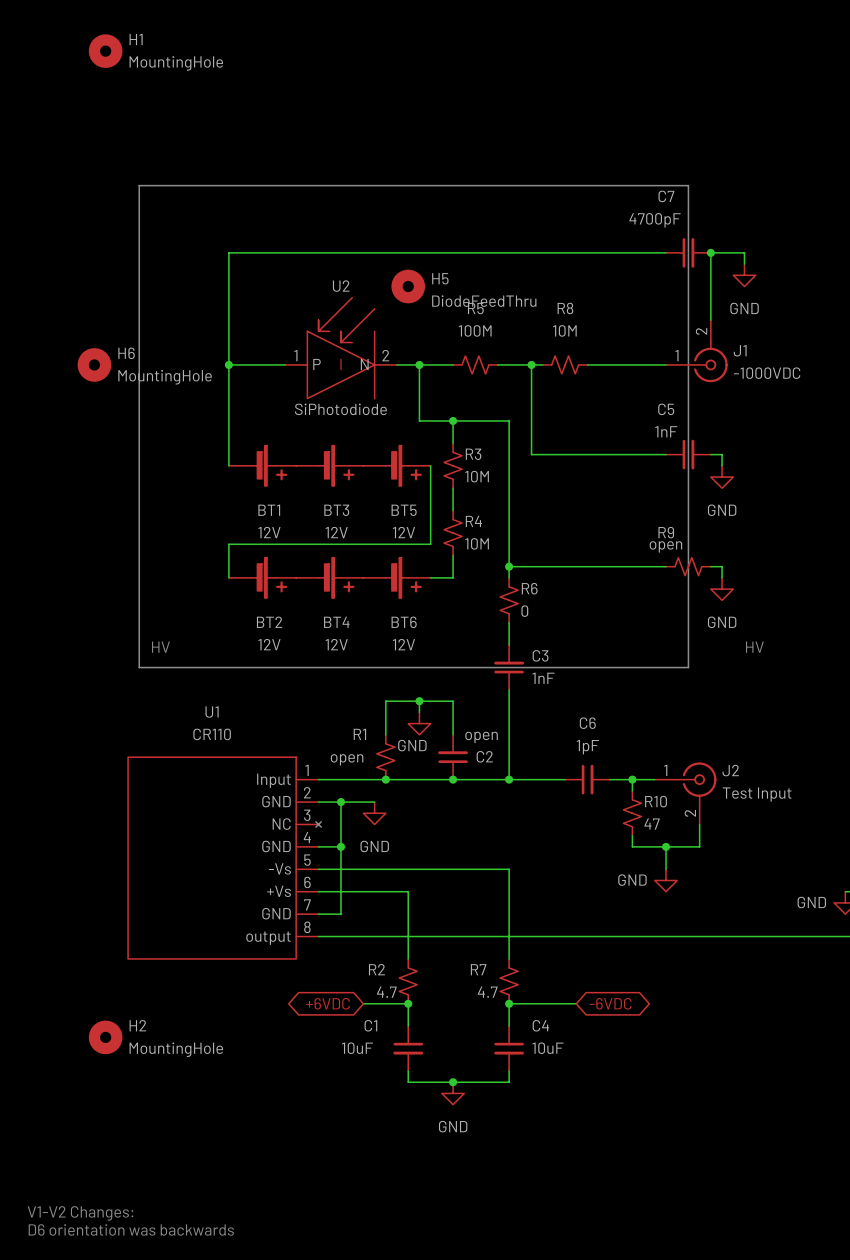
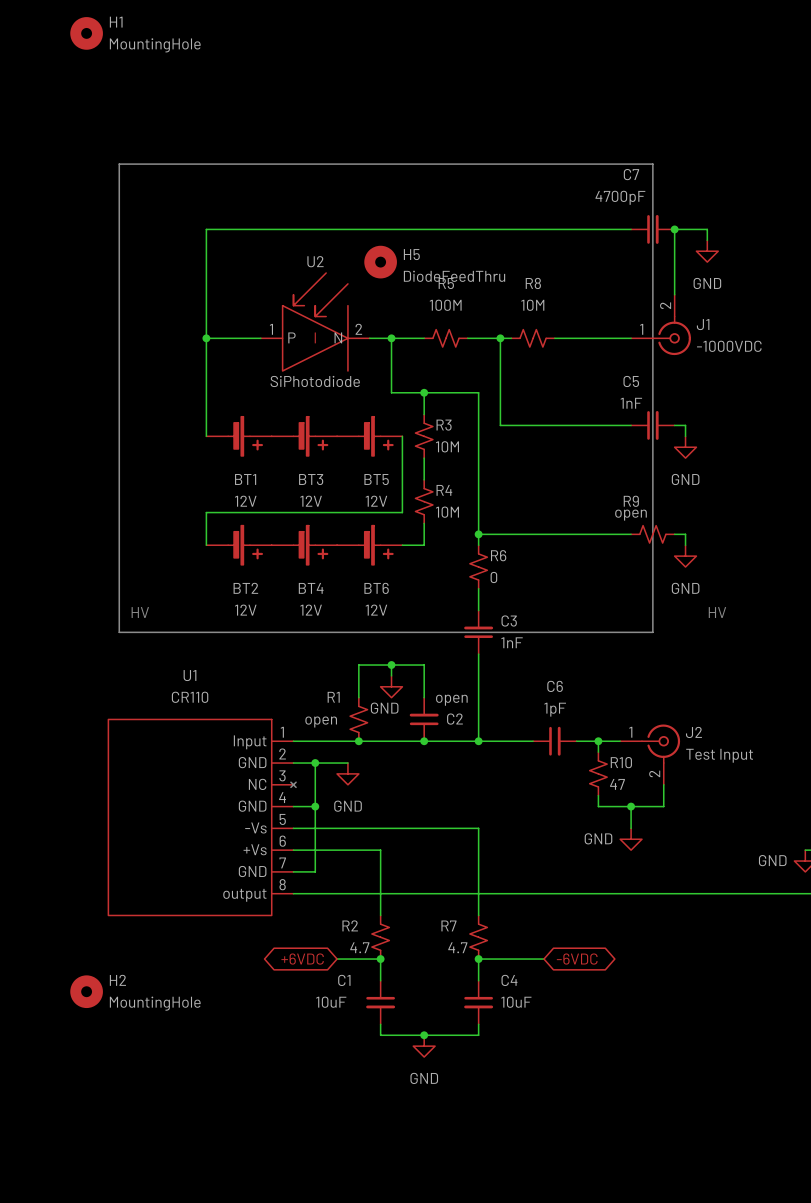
H6: MountingHole (94, 364) -> none
text: V1-V2 Changes: (80, 1213) -> none
text: D6 orientation was backwards (131, 1229) -> none

